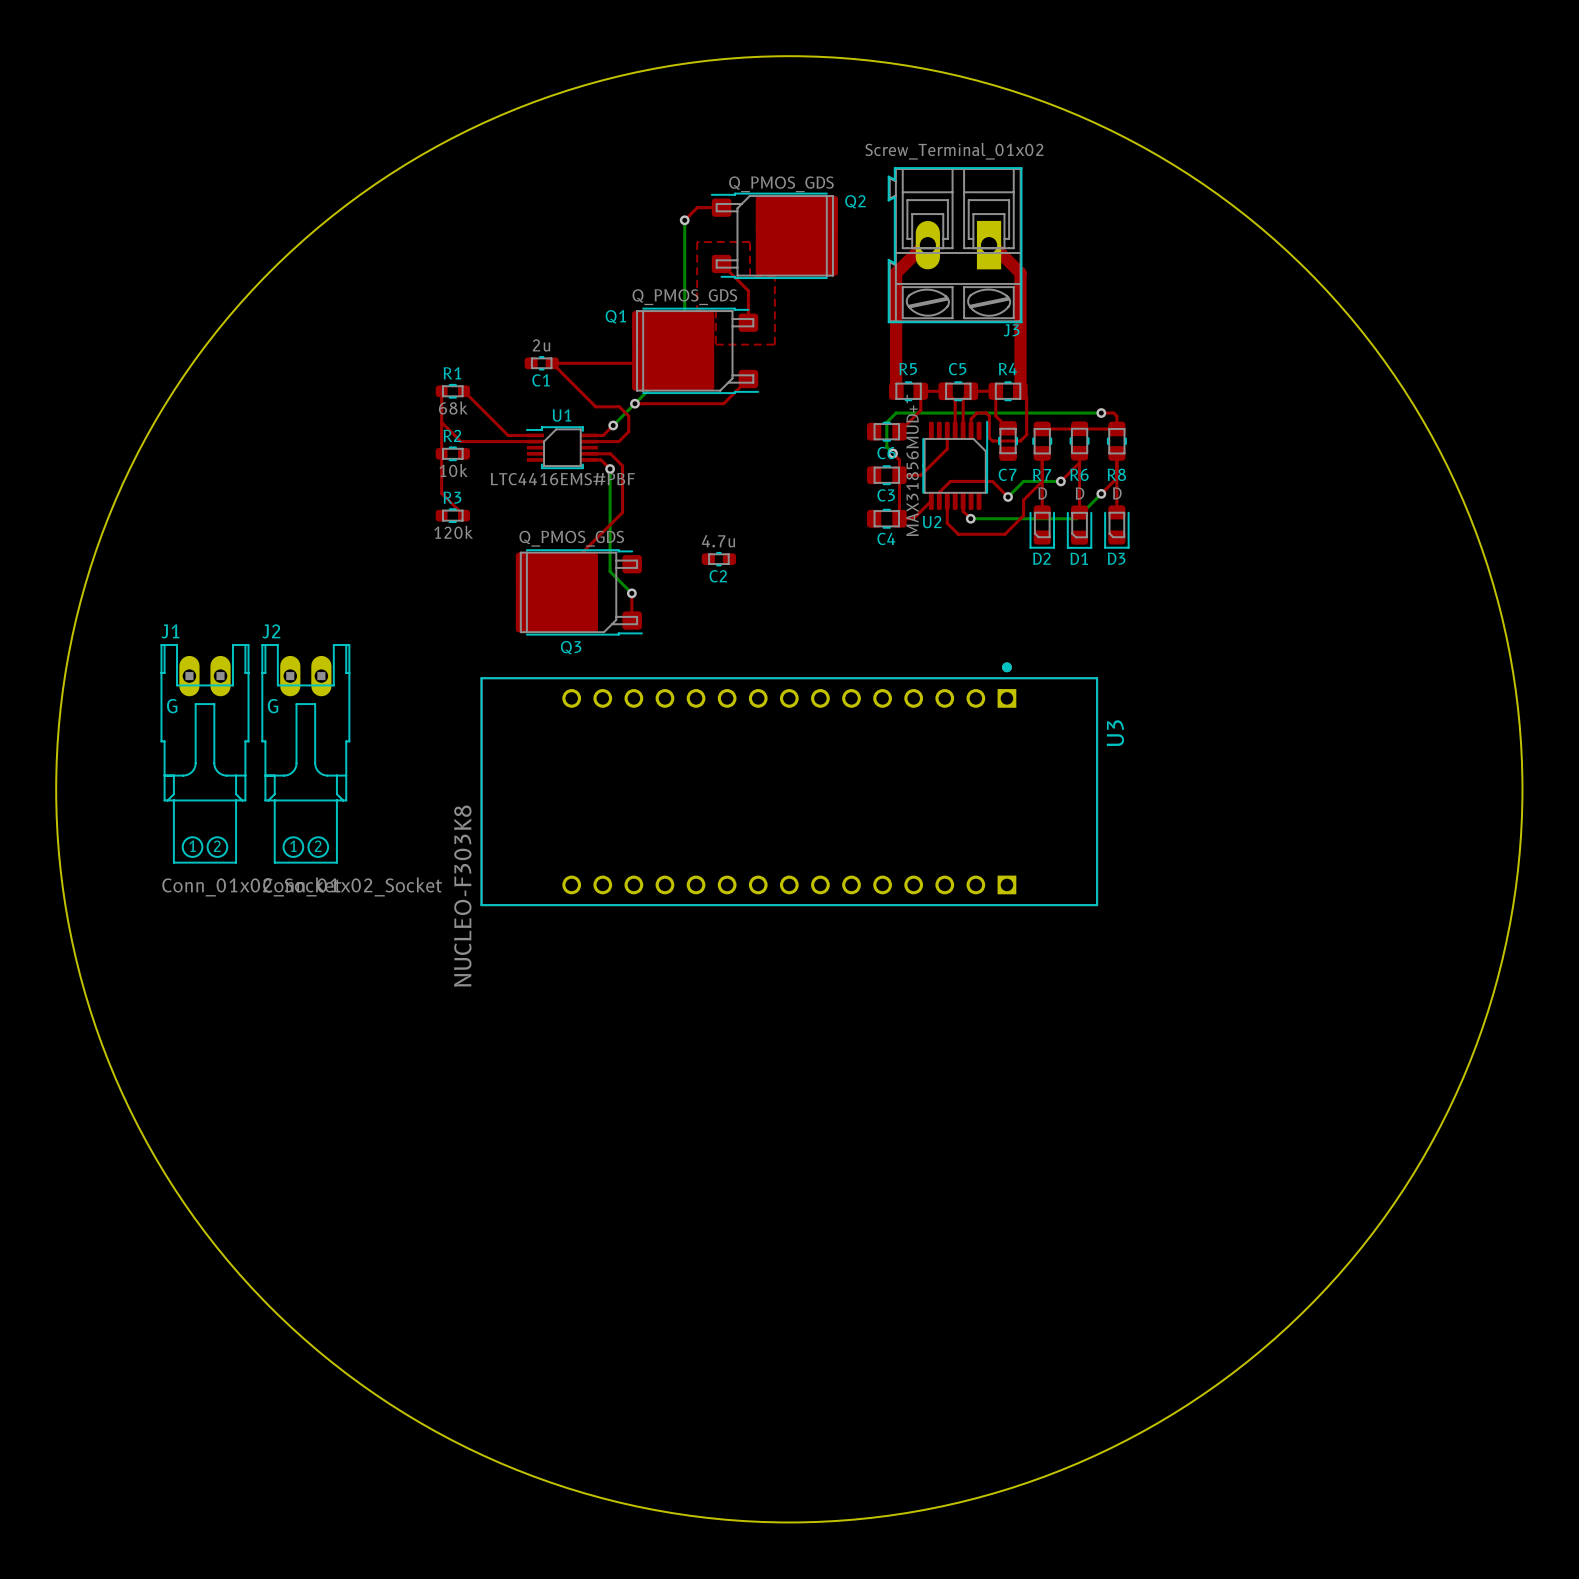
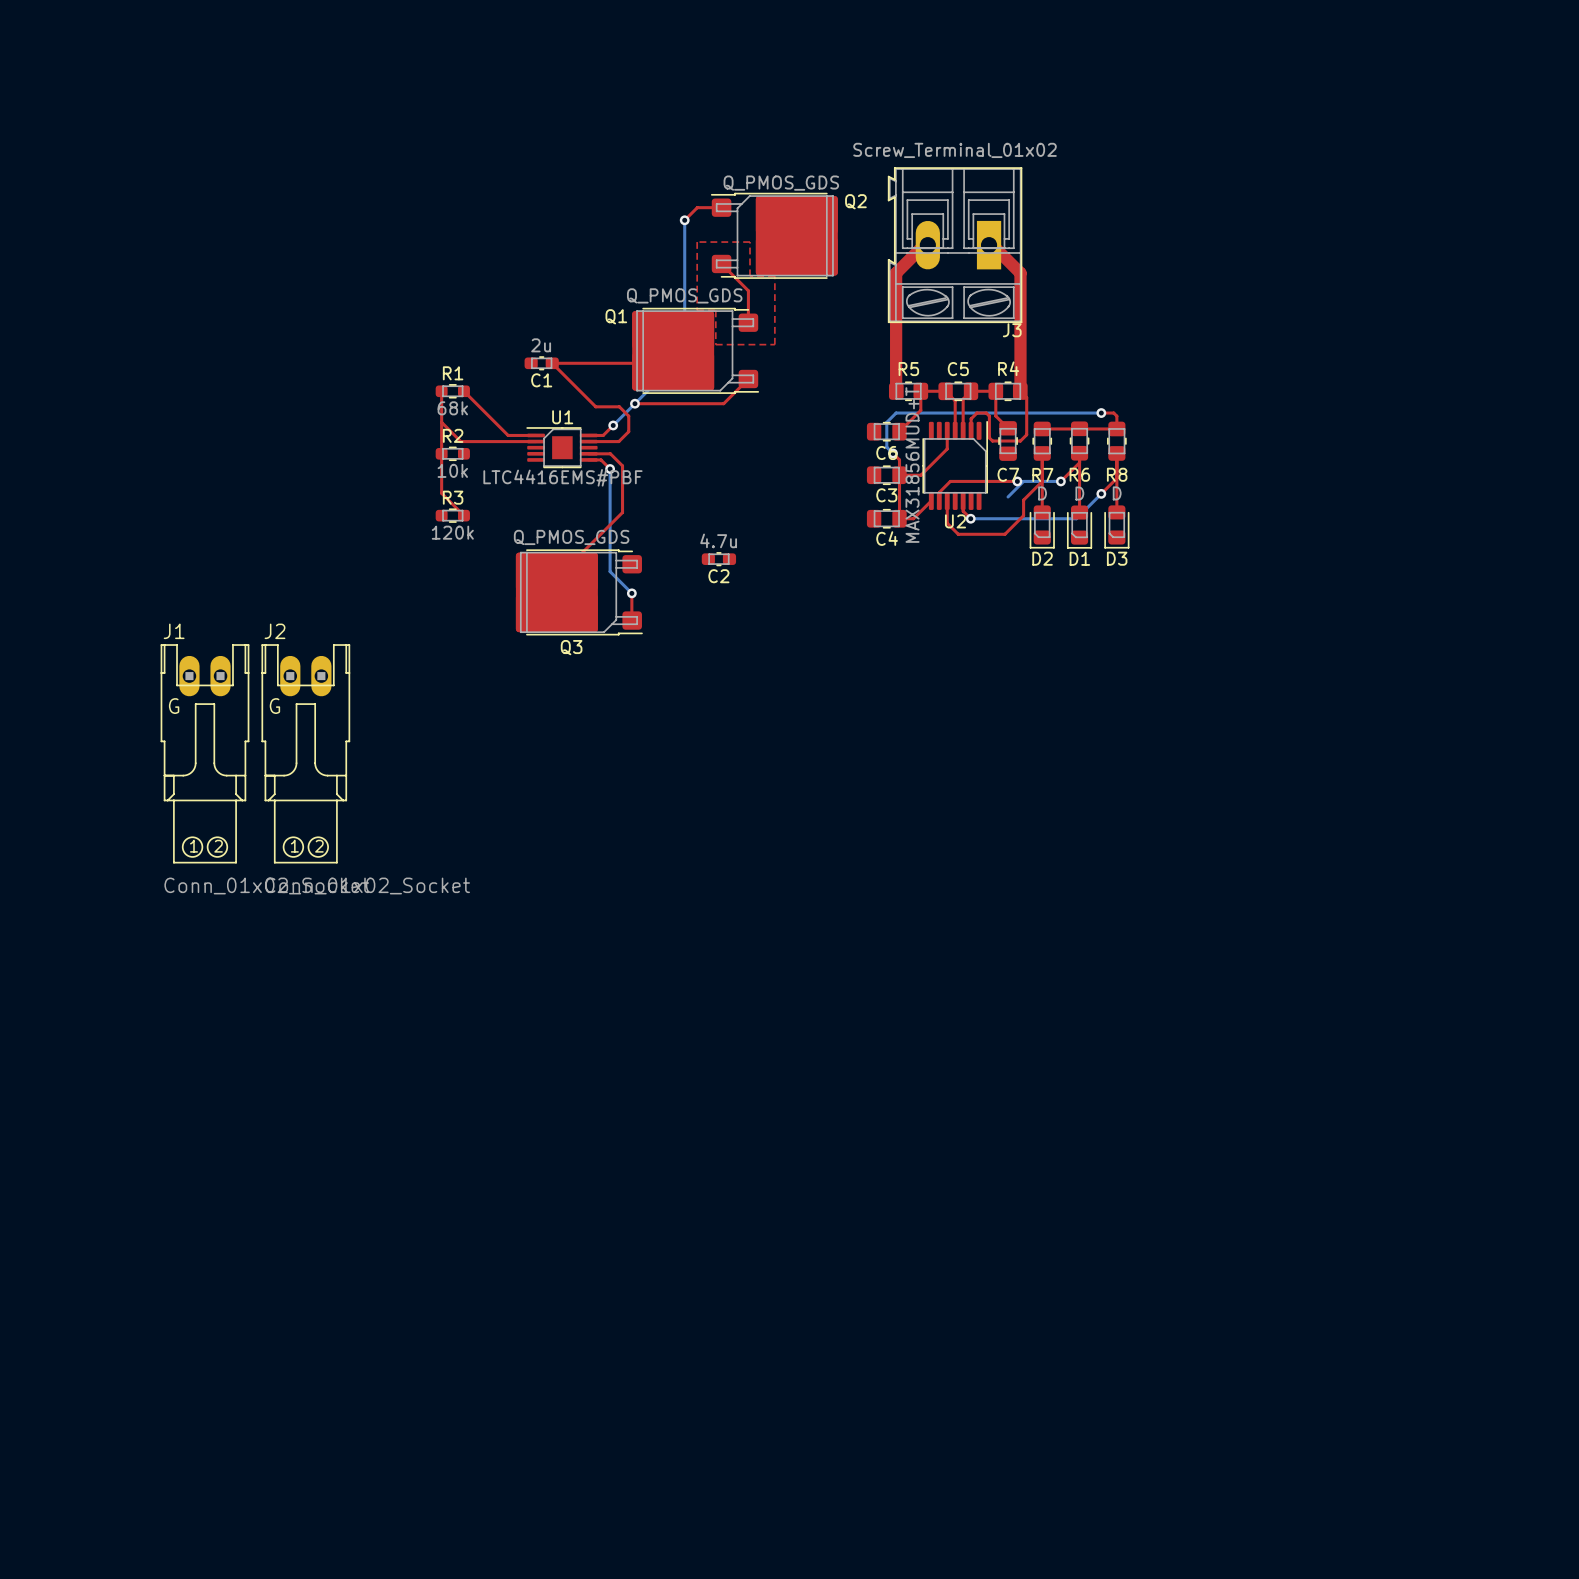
round board edge: [55, 55, 1524, 1524] -> none
U1 footprint: [525, 426, 598, 470] -> [526, 427, 598, 469]
top track: (992, 481) (1008, 496) -> (992, 481) (1017, 481)
via position: (1008, 496) -> (1017, 481)
U2 name position: U2 (932, 522) -> U2 (955, 521)
U3: NUCLEO-F303K8 (789, 784) -> none

